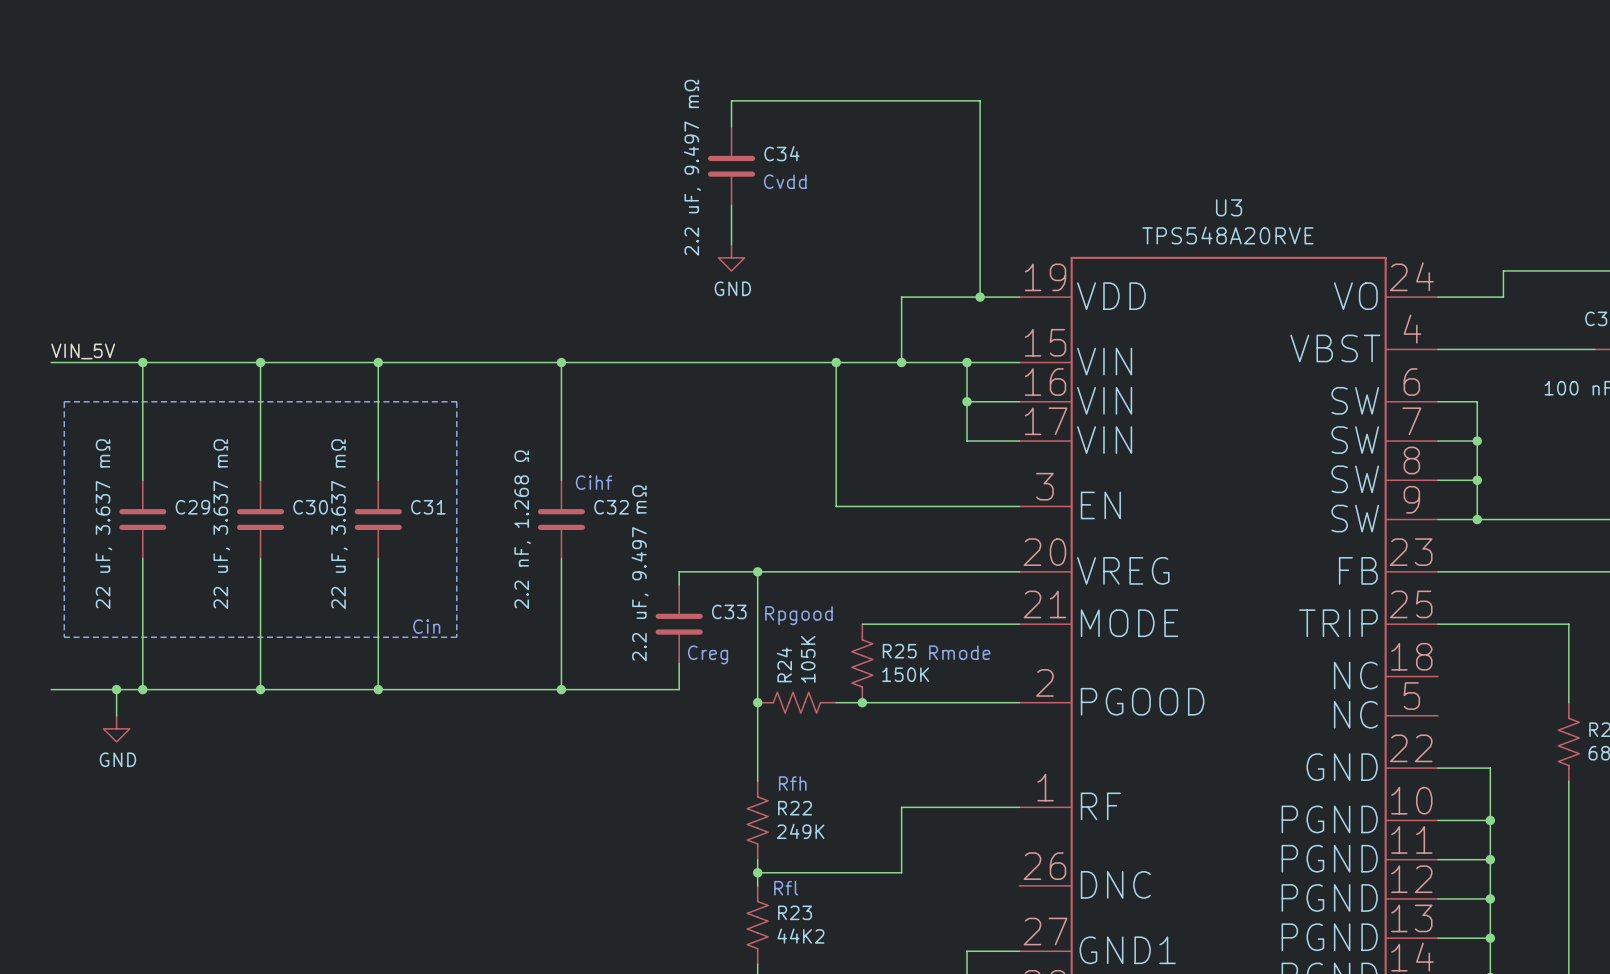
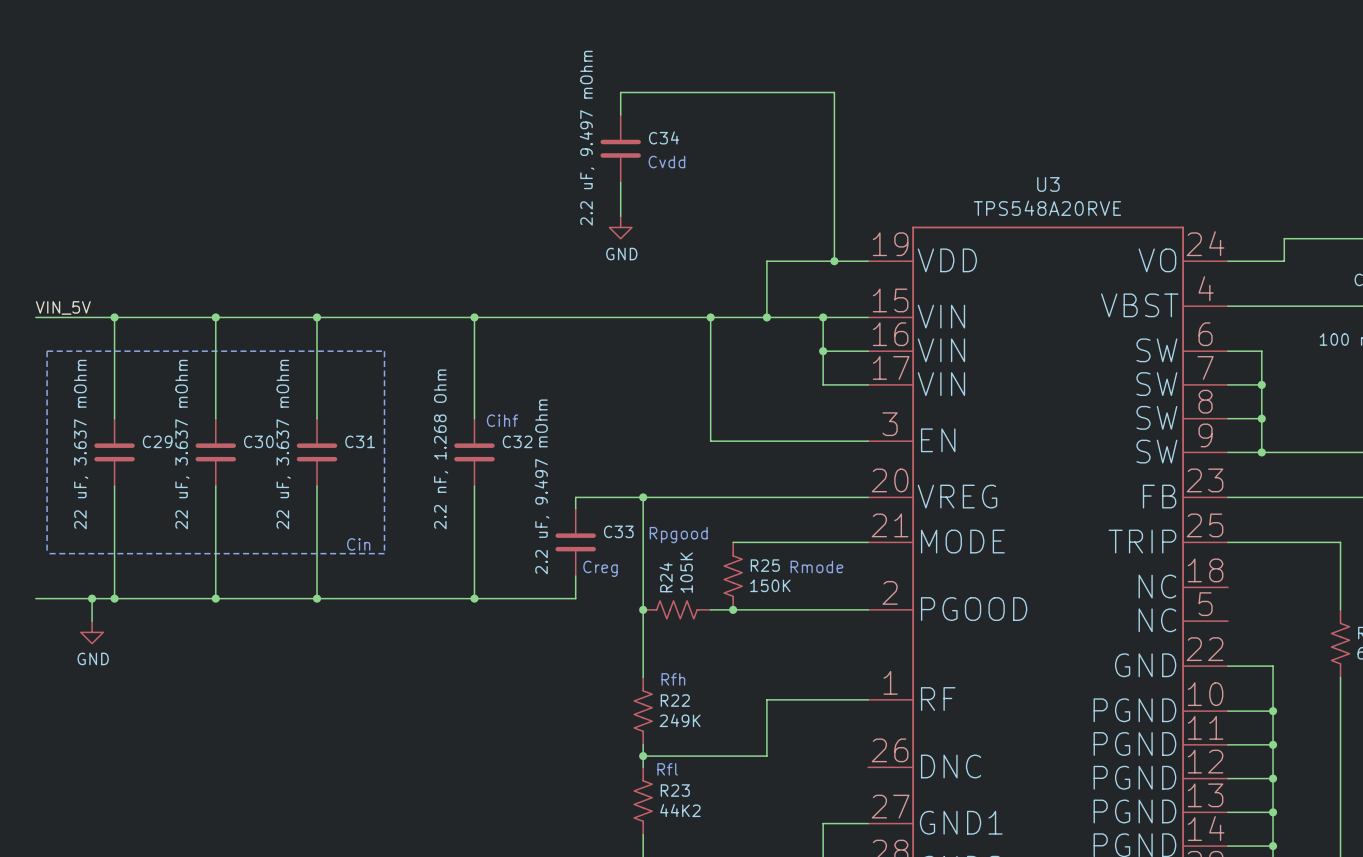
C34 value: 2.2 uF, 9.497 mΩ (692, 167) -> 2.2 uF, 9.497 mOhm (587, 138)
C29 value: 22 uF, 3.637 mΩ (103, 524) -> 22 uF, 3.637 mOhm (81, 444)
C30 value: 22 uF, 3.637 mΩ (221, 524) -> 22 uF, 3.637 mOhm (182, 444)
C31 value: 22 uF, 3.637 mΩ (339, 524) -> 22 uF, 3.637 mOhm (283, 444)
C32 value: 2.2 nF, 1.268 Ω (522, 529) -> 2.2 nF, 1.268 Ohm (441, 449)
C33 value: 2.2 uF, 9.497 mΩ (640, 573) -> 2.2 uF, 9.497 mOhm (542, 486)

